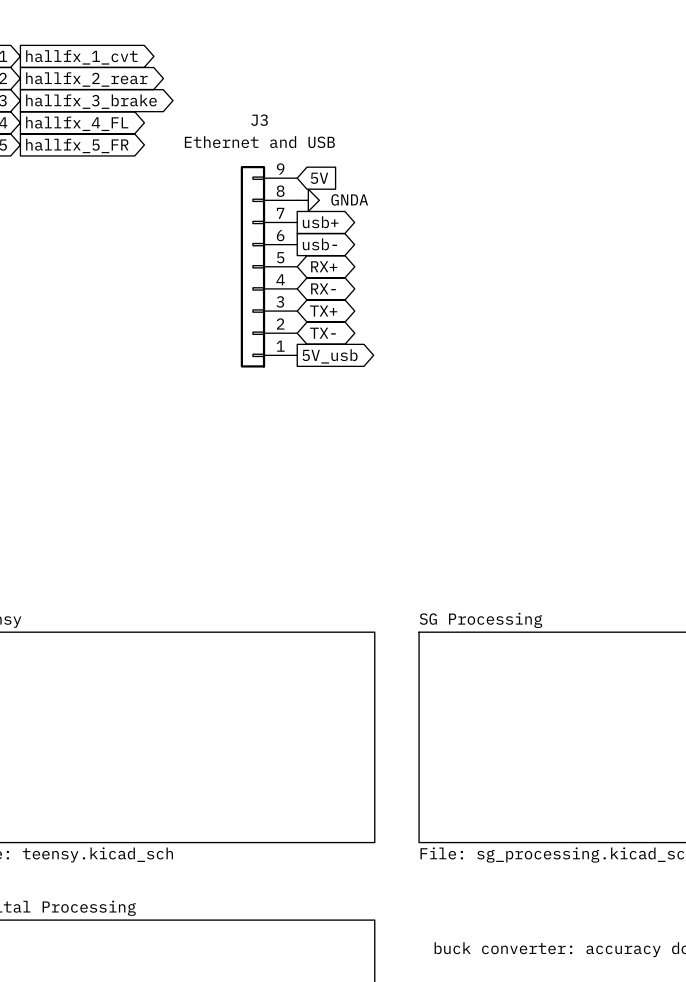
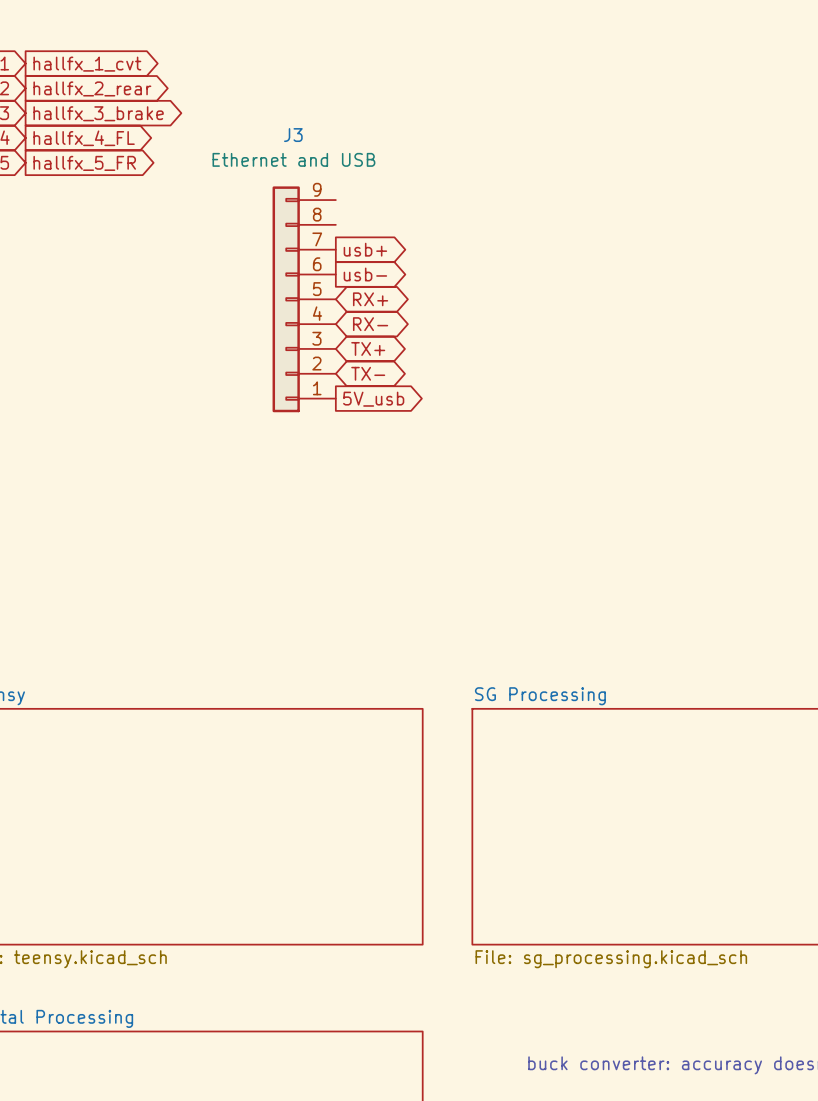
global label: 5V (319, 178) -> none
power symbol: GNDA (308, 200) -> none

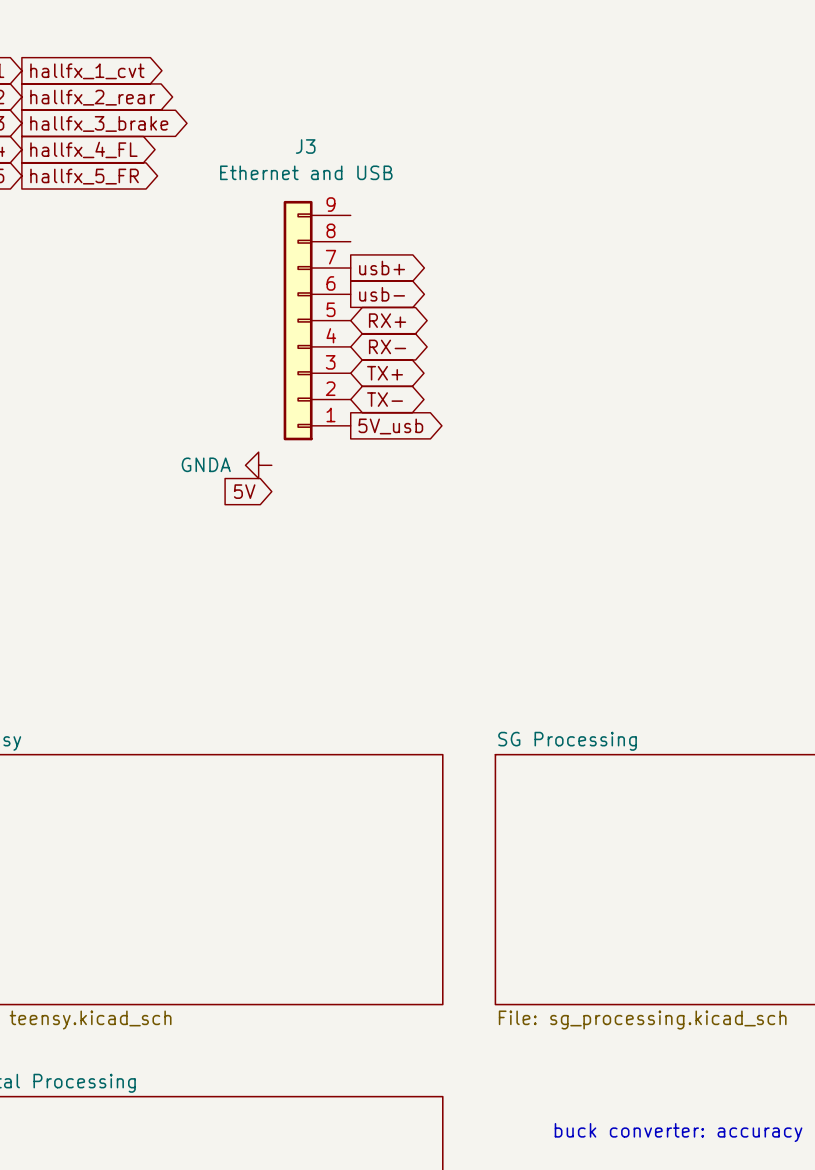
power symbol: none -> GNDA (258, 465)
global label: none -> 5V (244, 491)

